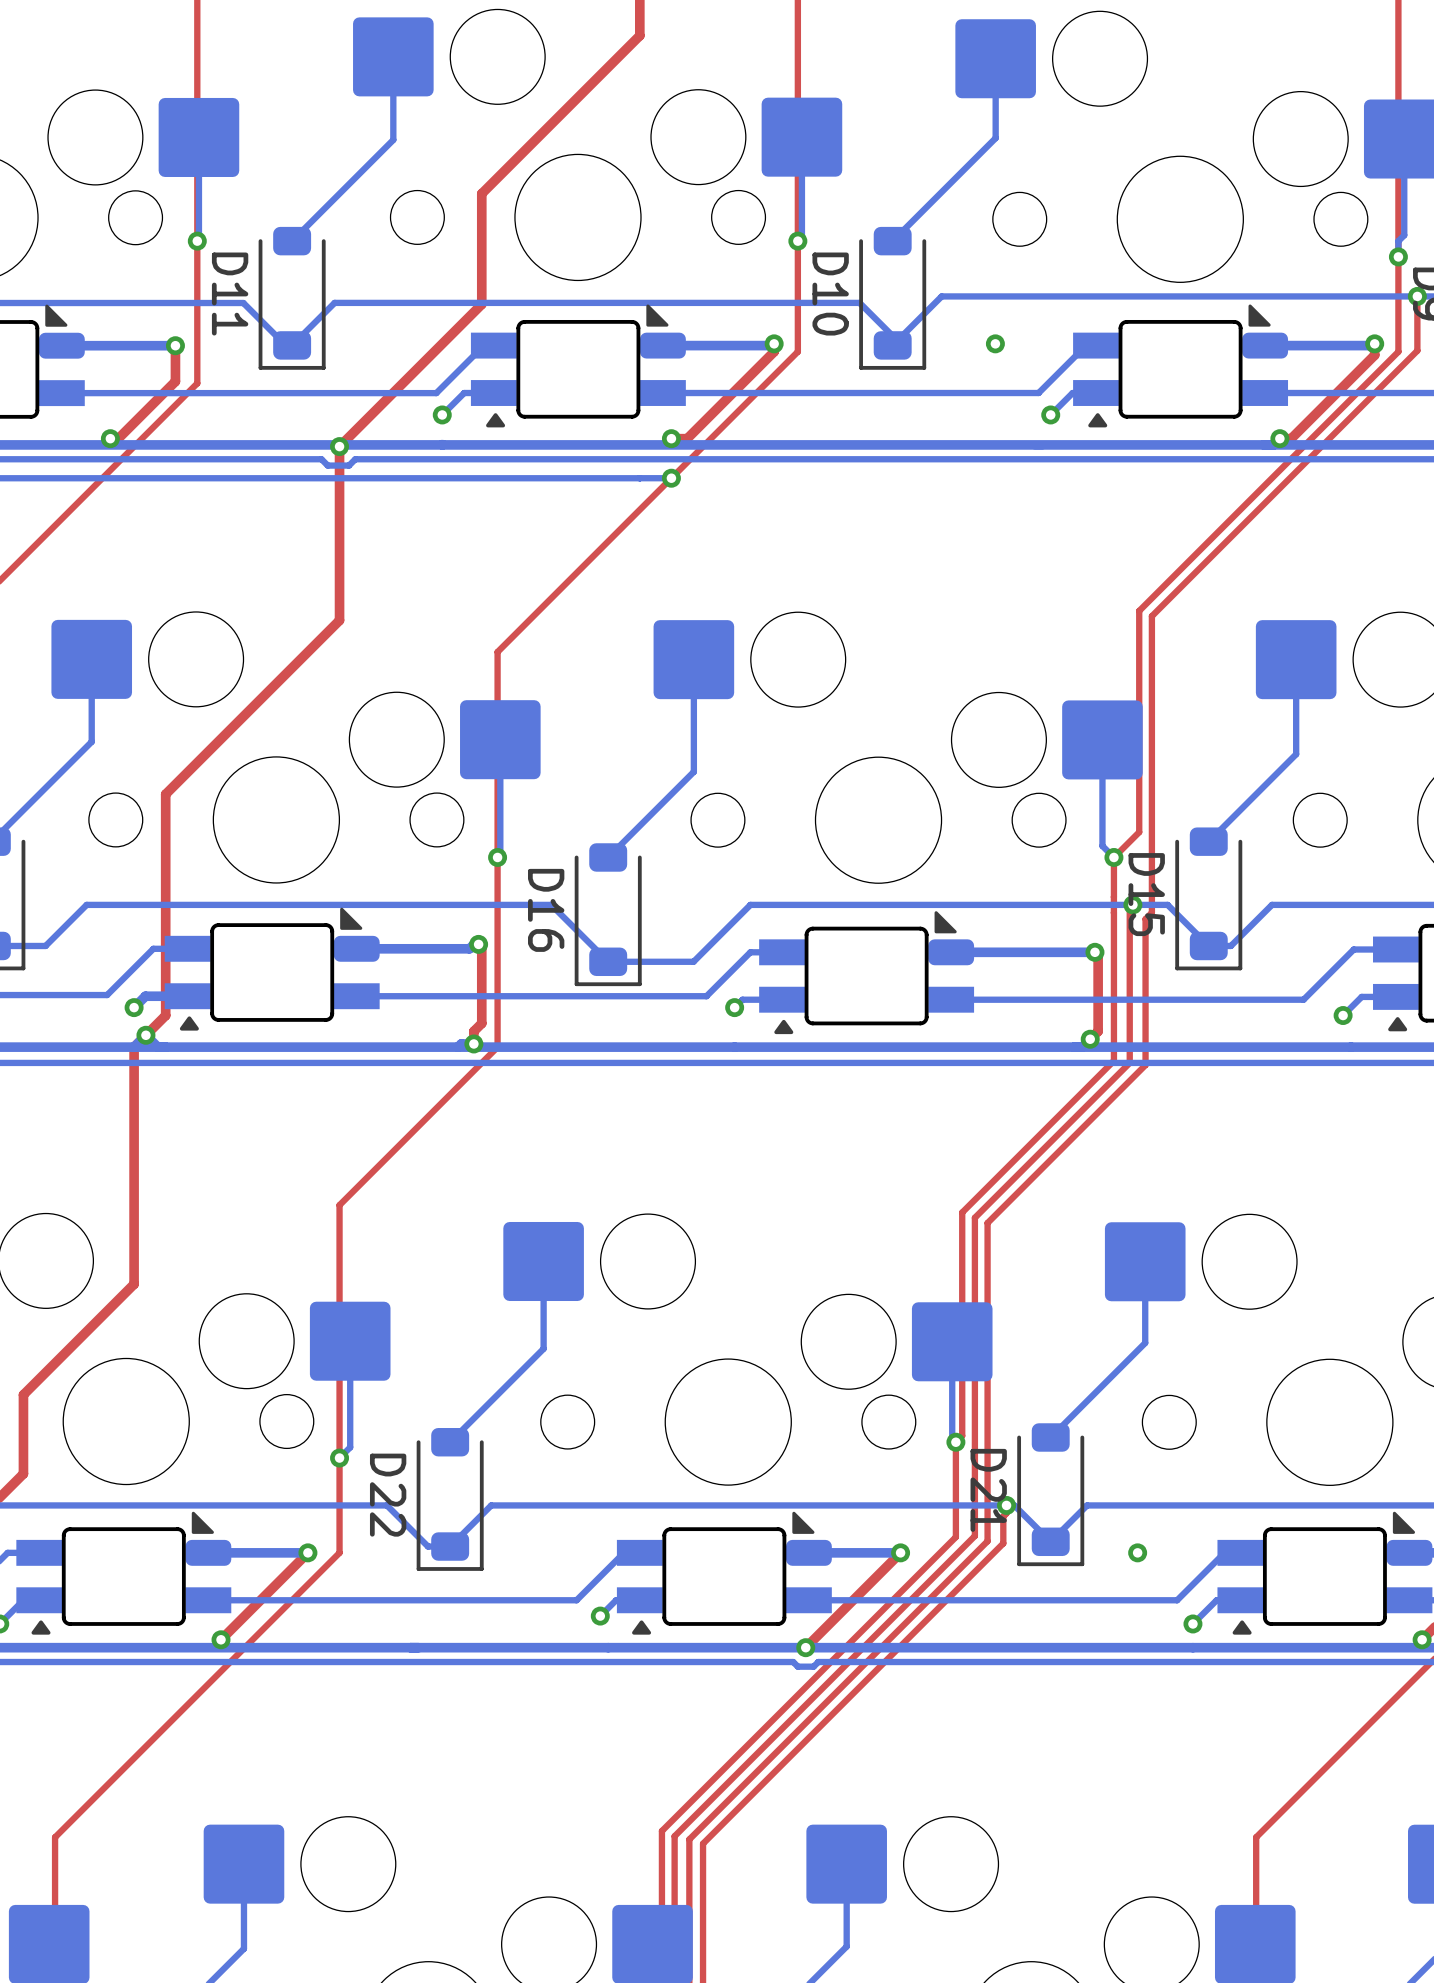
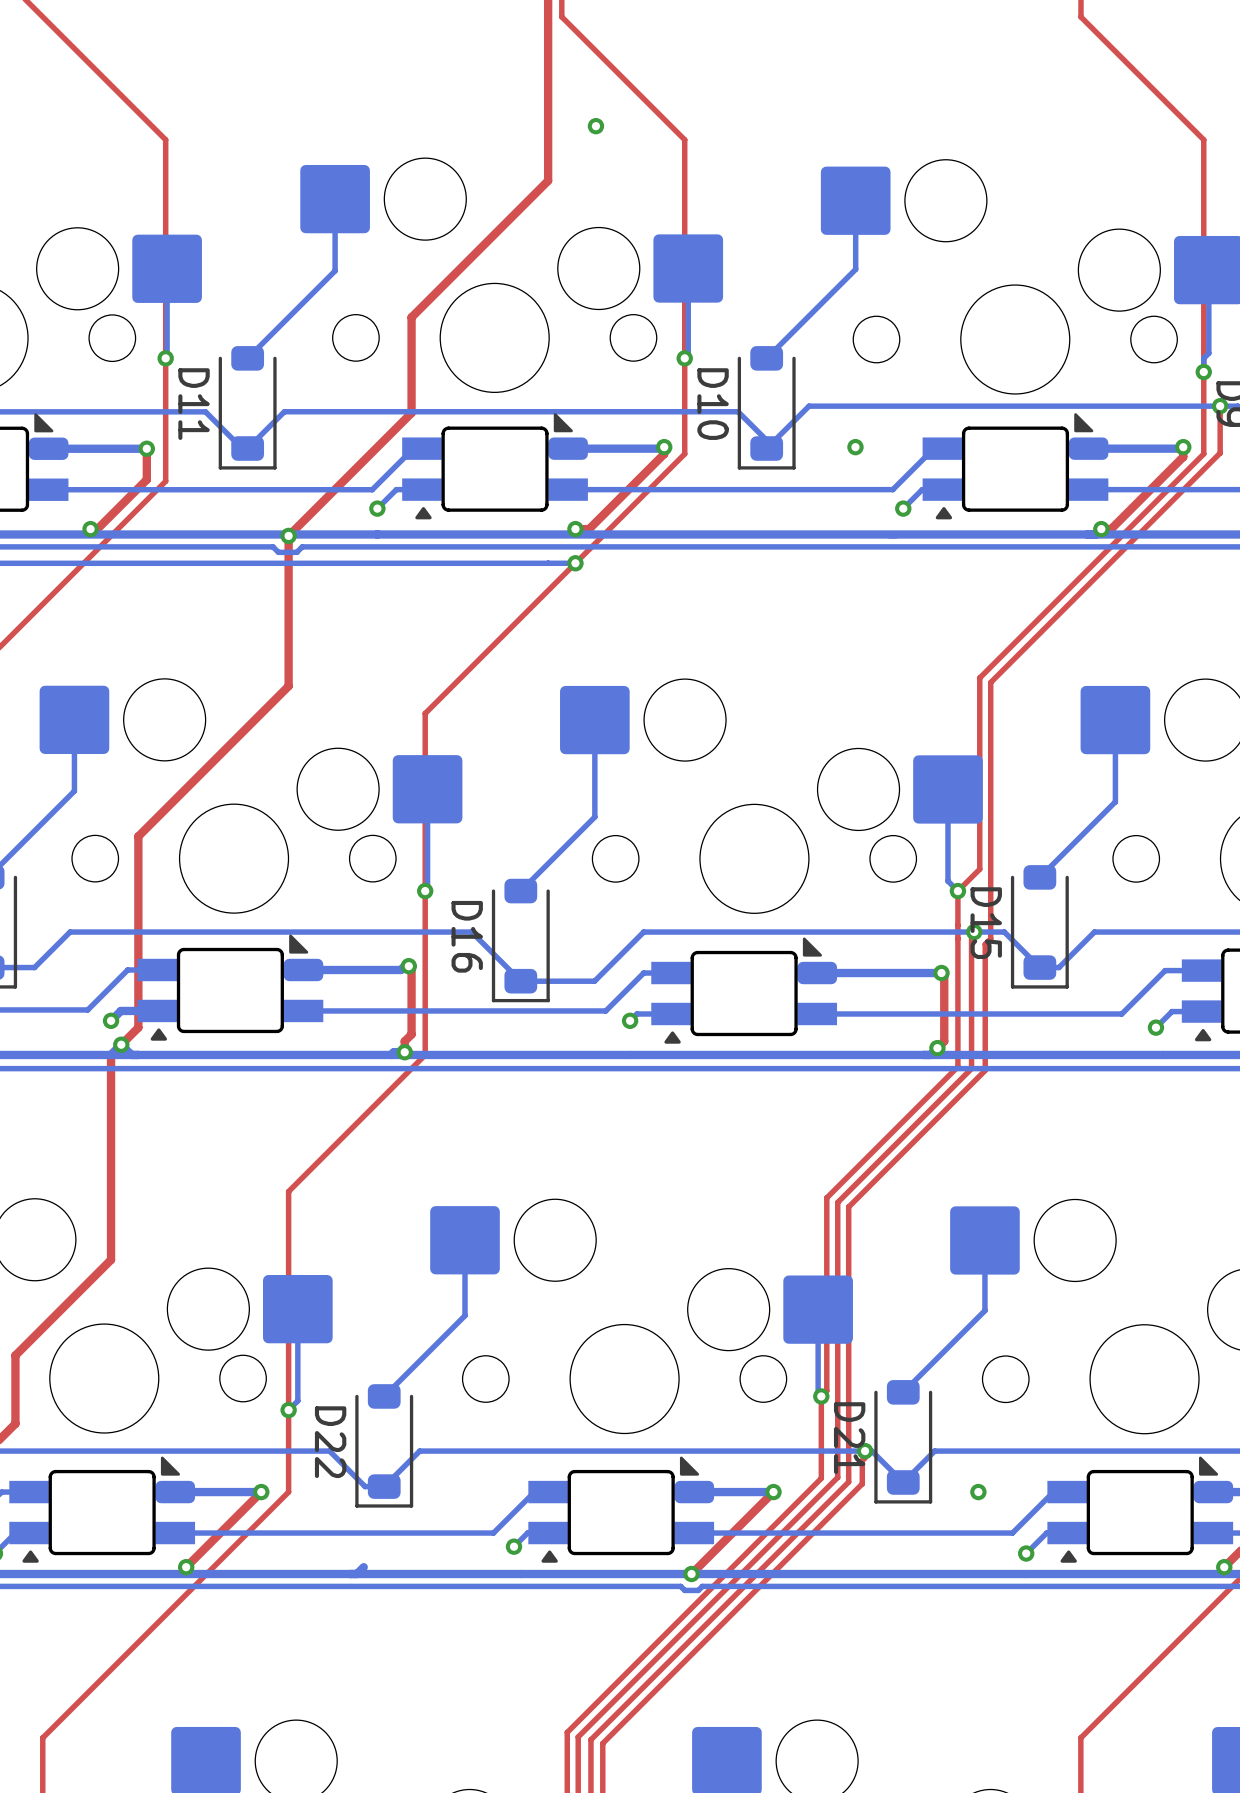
bottom track: none -> (363, 1567) (356, 1574)

